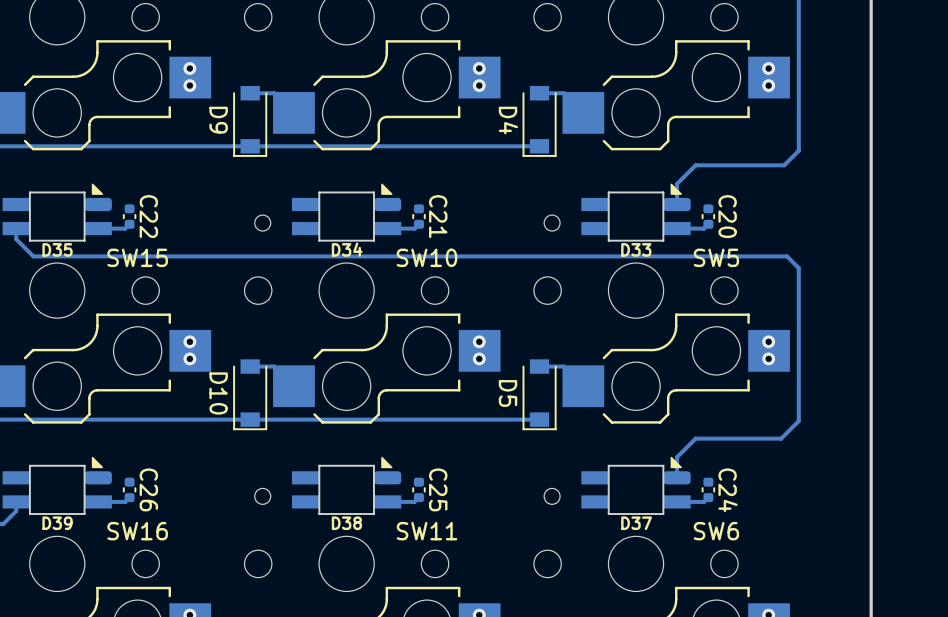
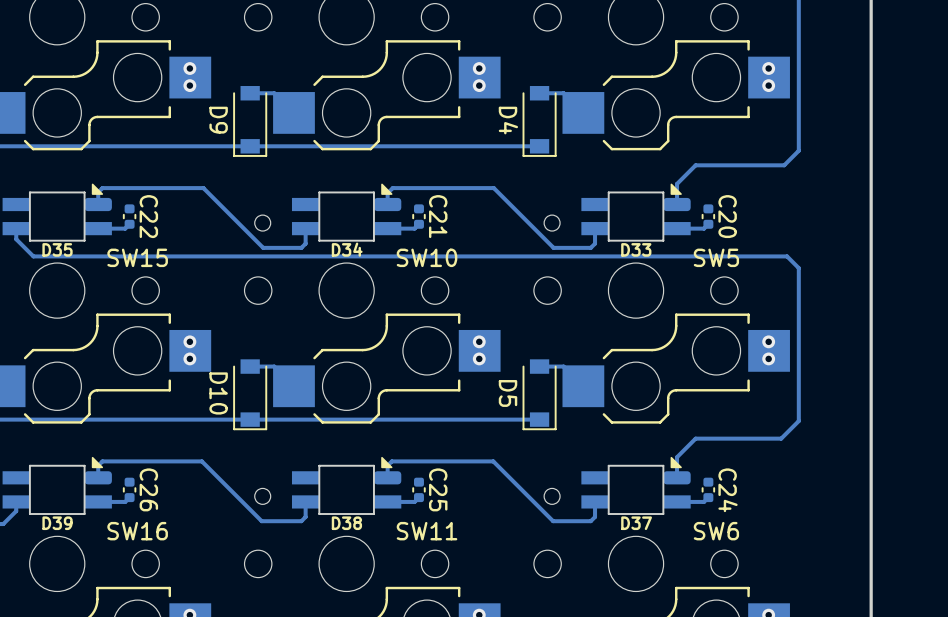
track: none -> (98, 202) (98, 192) (102, 188) (203, 188) (263, 247) (301, 247) (305, 243) (305, 226)
track: none -> (387, 202) (387, 193) (392, 188) (493, 188) (553, 247) (590, 247) (595, 243) (595, 226)
track: none -> (98, 475) (98, 465) (102, 461) (201, 461) (261, 521) (301, 521) (305, 516) (305, 500)
track: none -> (387, 475) (387, 465) (391, 461) (493, 461) (553, 521) (590, 521) (595, 516) (595, 500)

